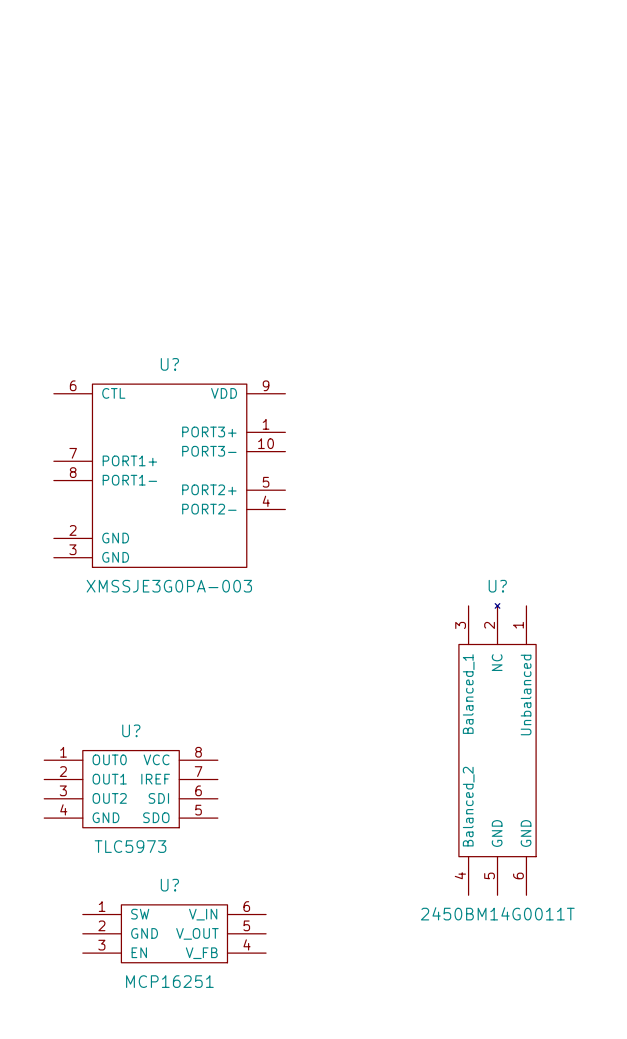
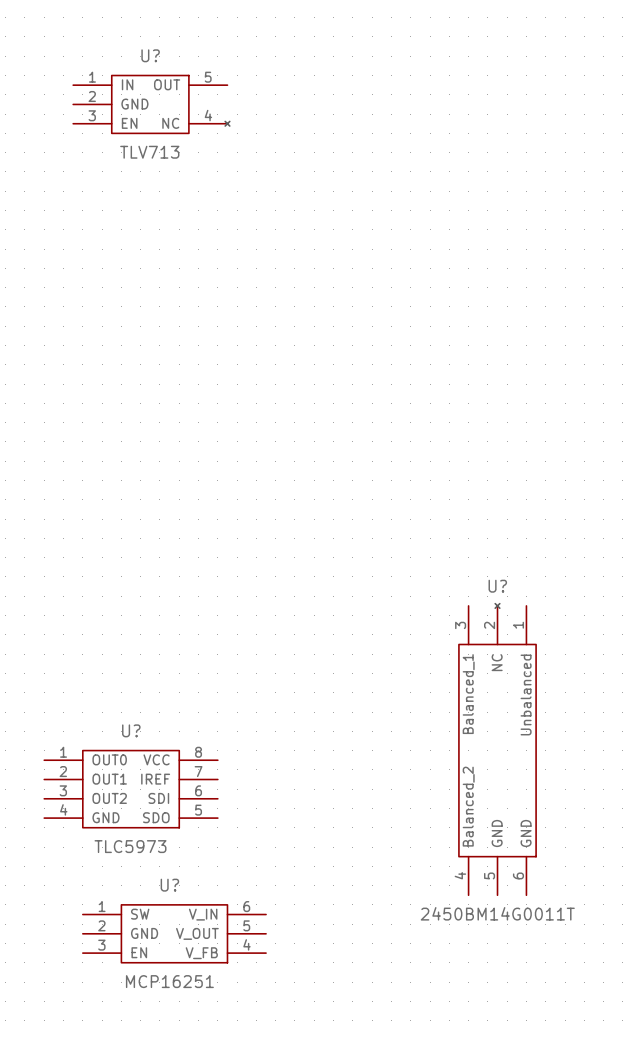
U?: none -> TLV713 (151, 104)
U?: XMSSJE3G0PA-003 (169, 475) -> none

